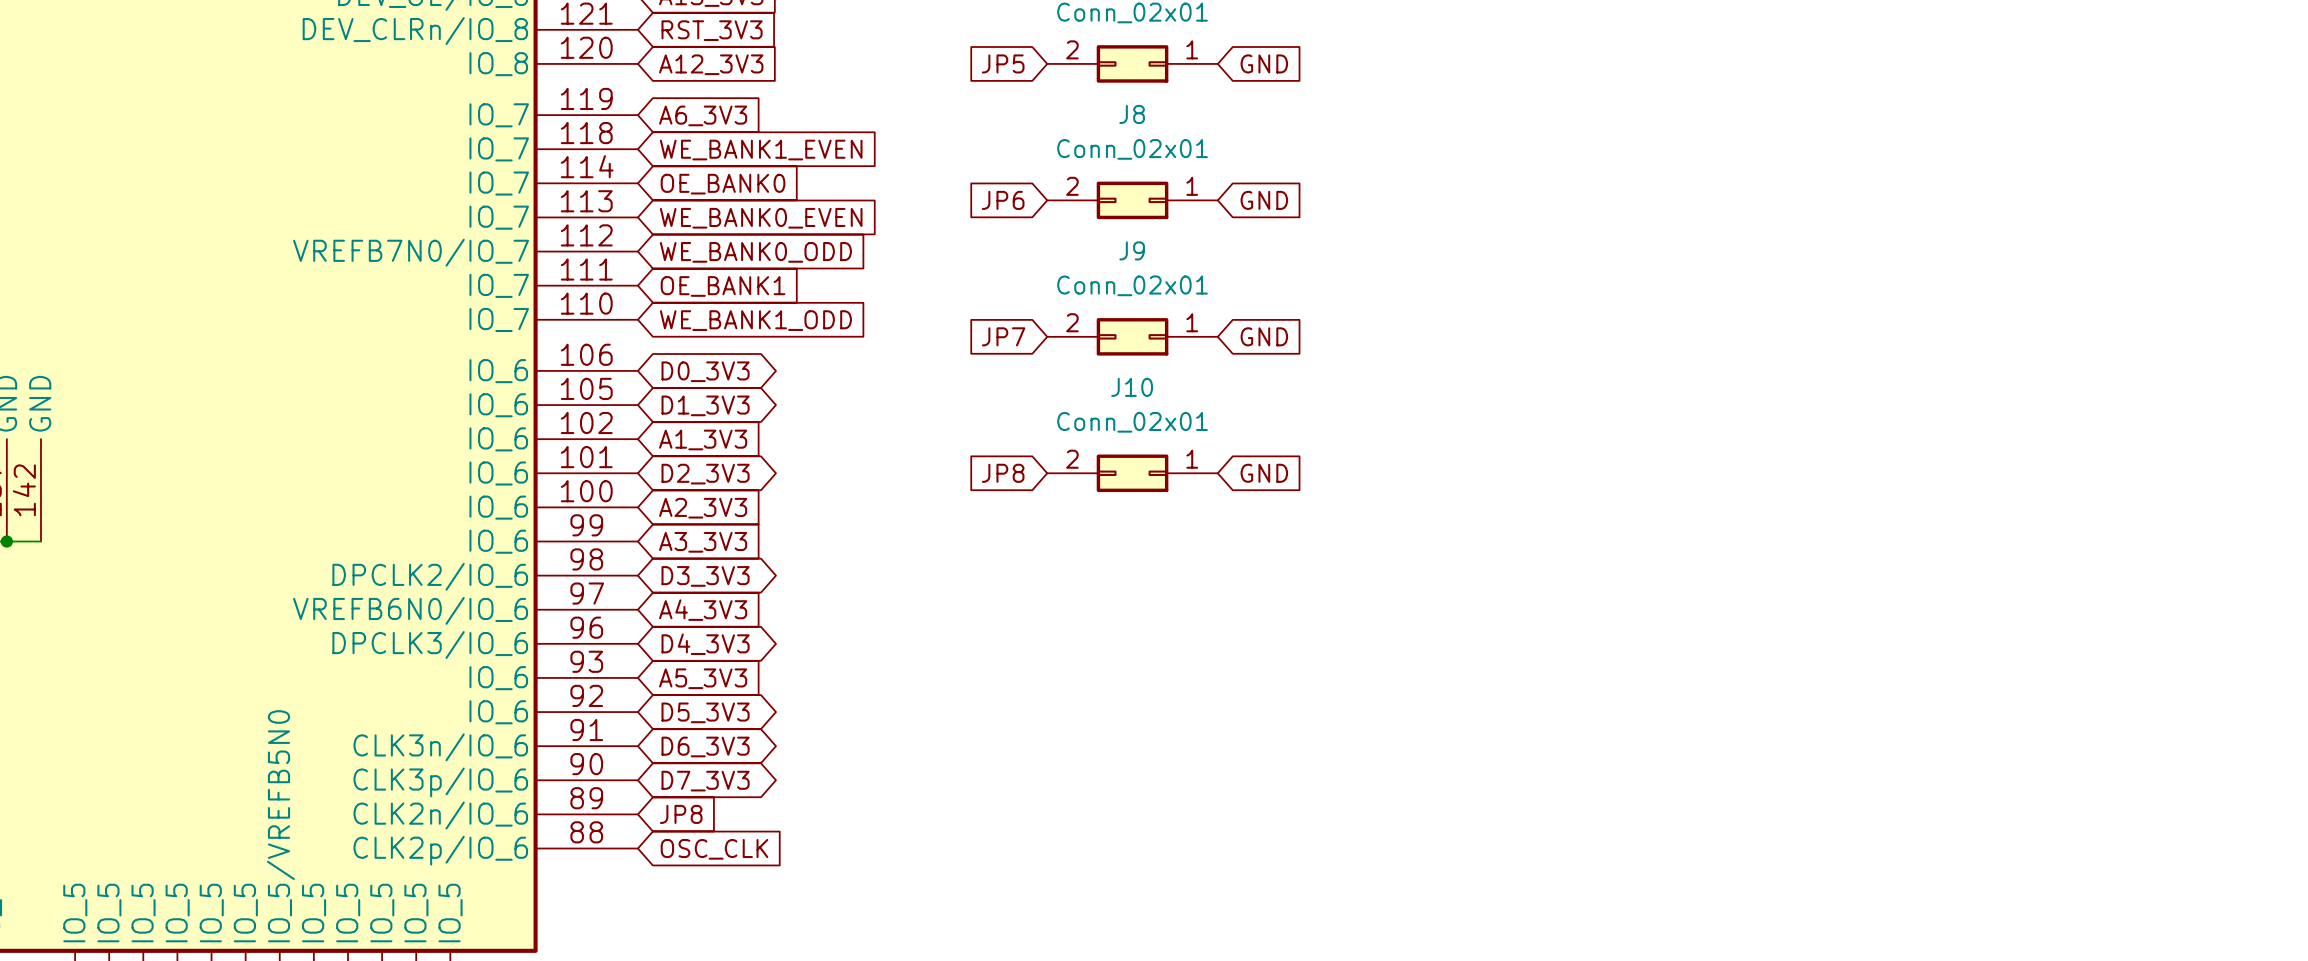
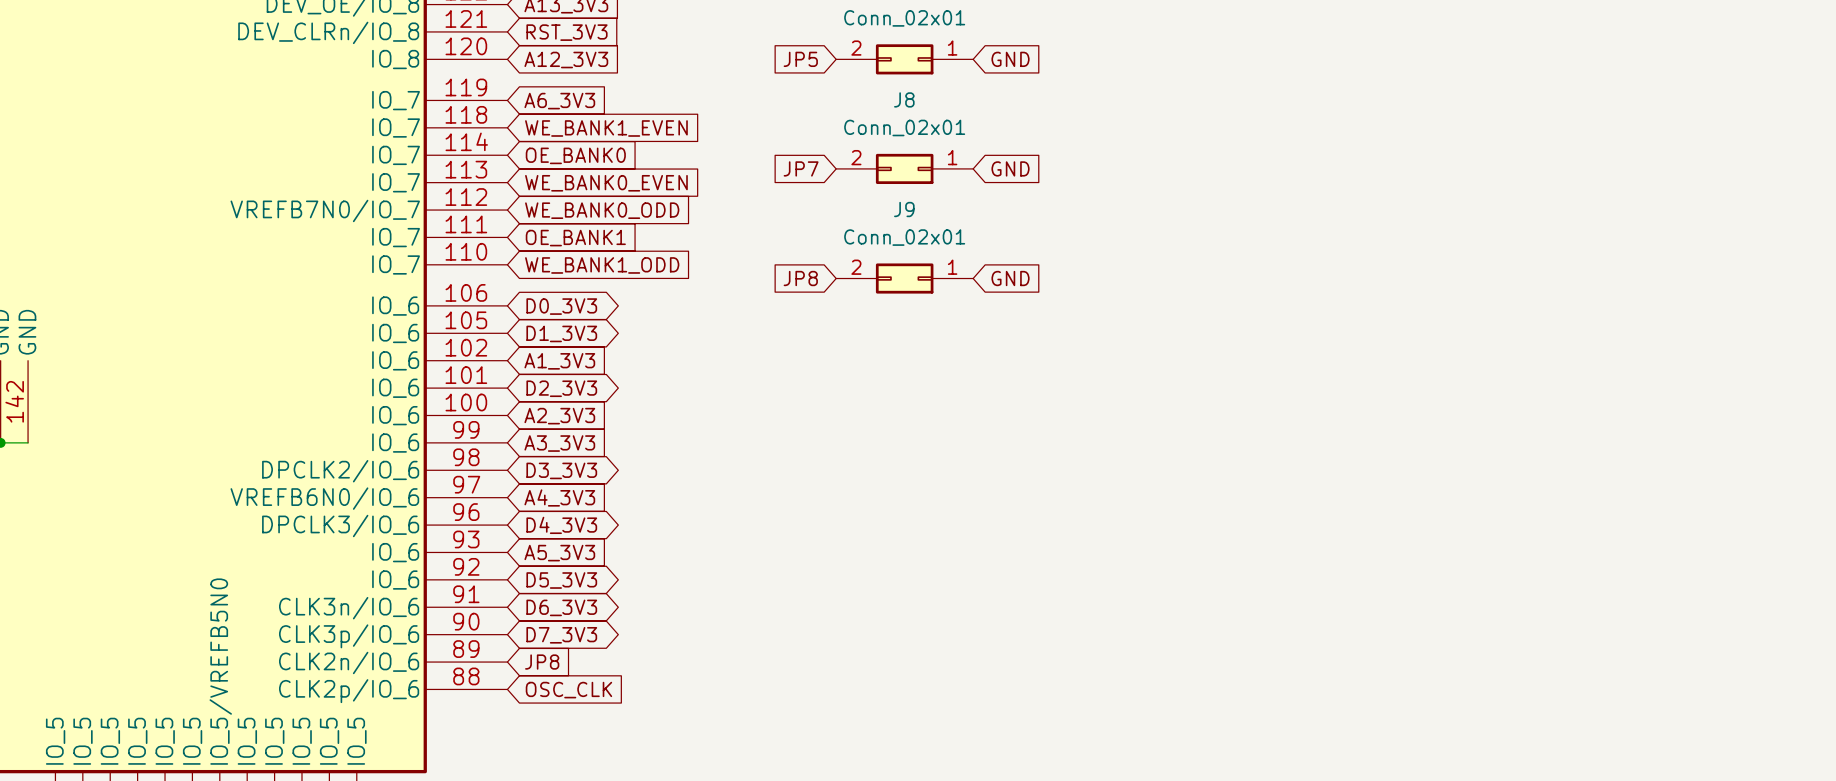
global label: JP6 (1003, 200) -> JP7 (801, 168)
global label: JP7 (1003, 336) -> JP8 (800, 278)
global label: JP8 (1003, 473) -> none
J10: Conn_02x01 (1132, 473) -> none
global label: GND (1264, 473) -> none

